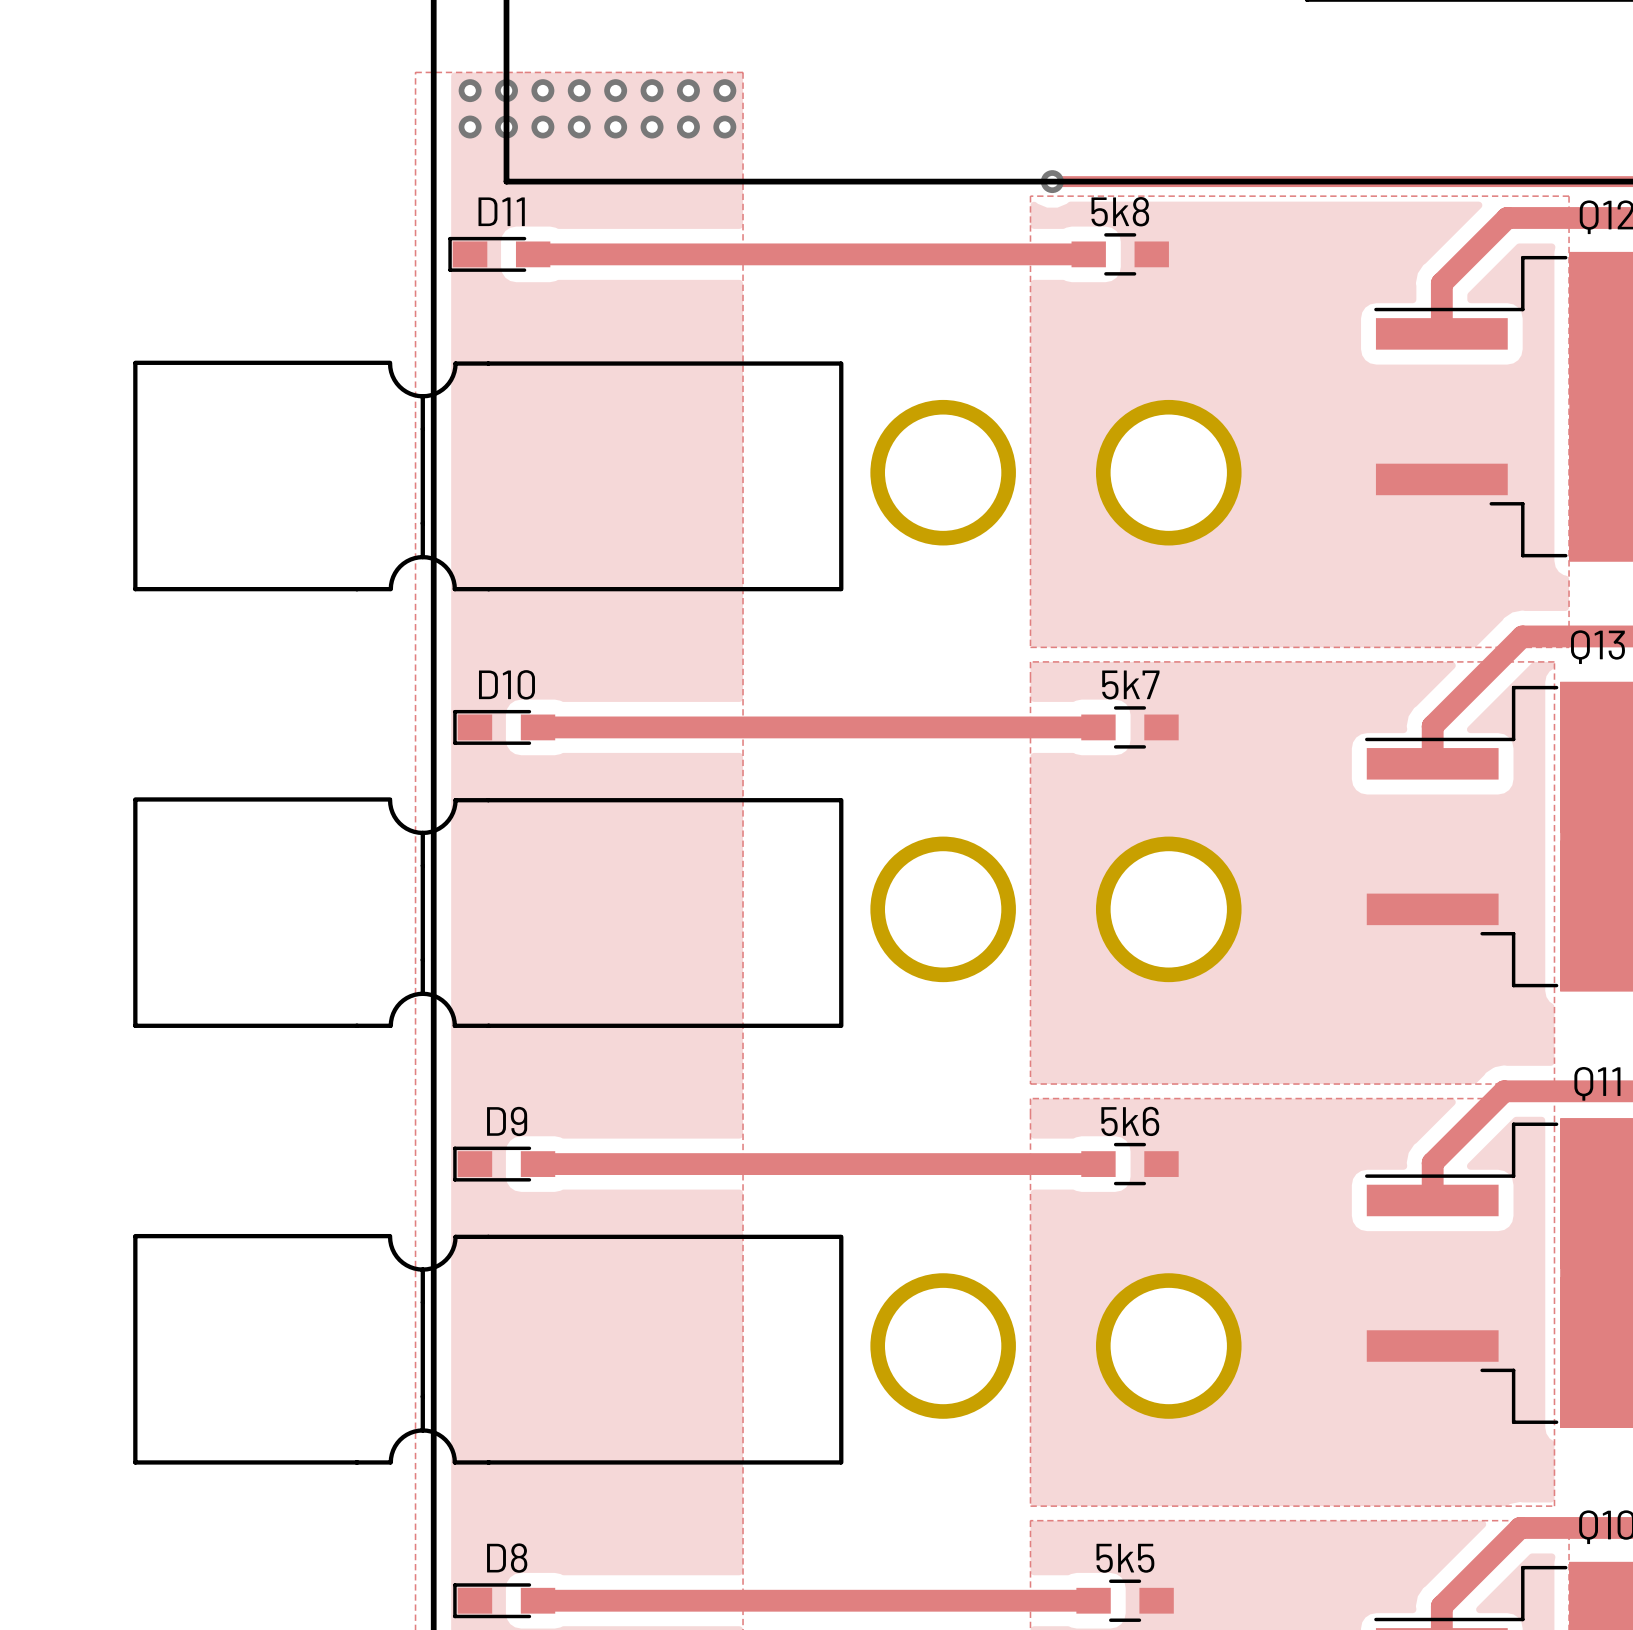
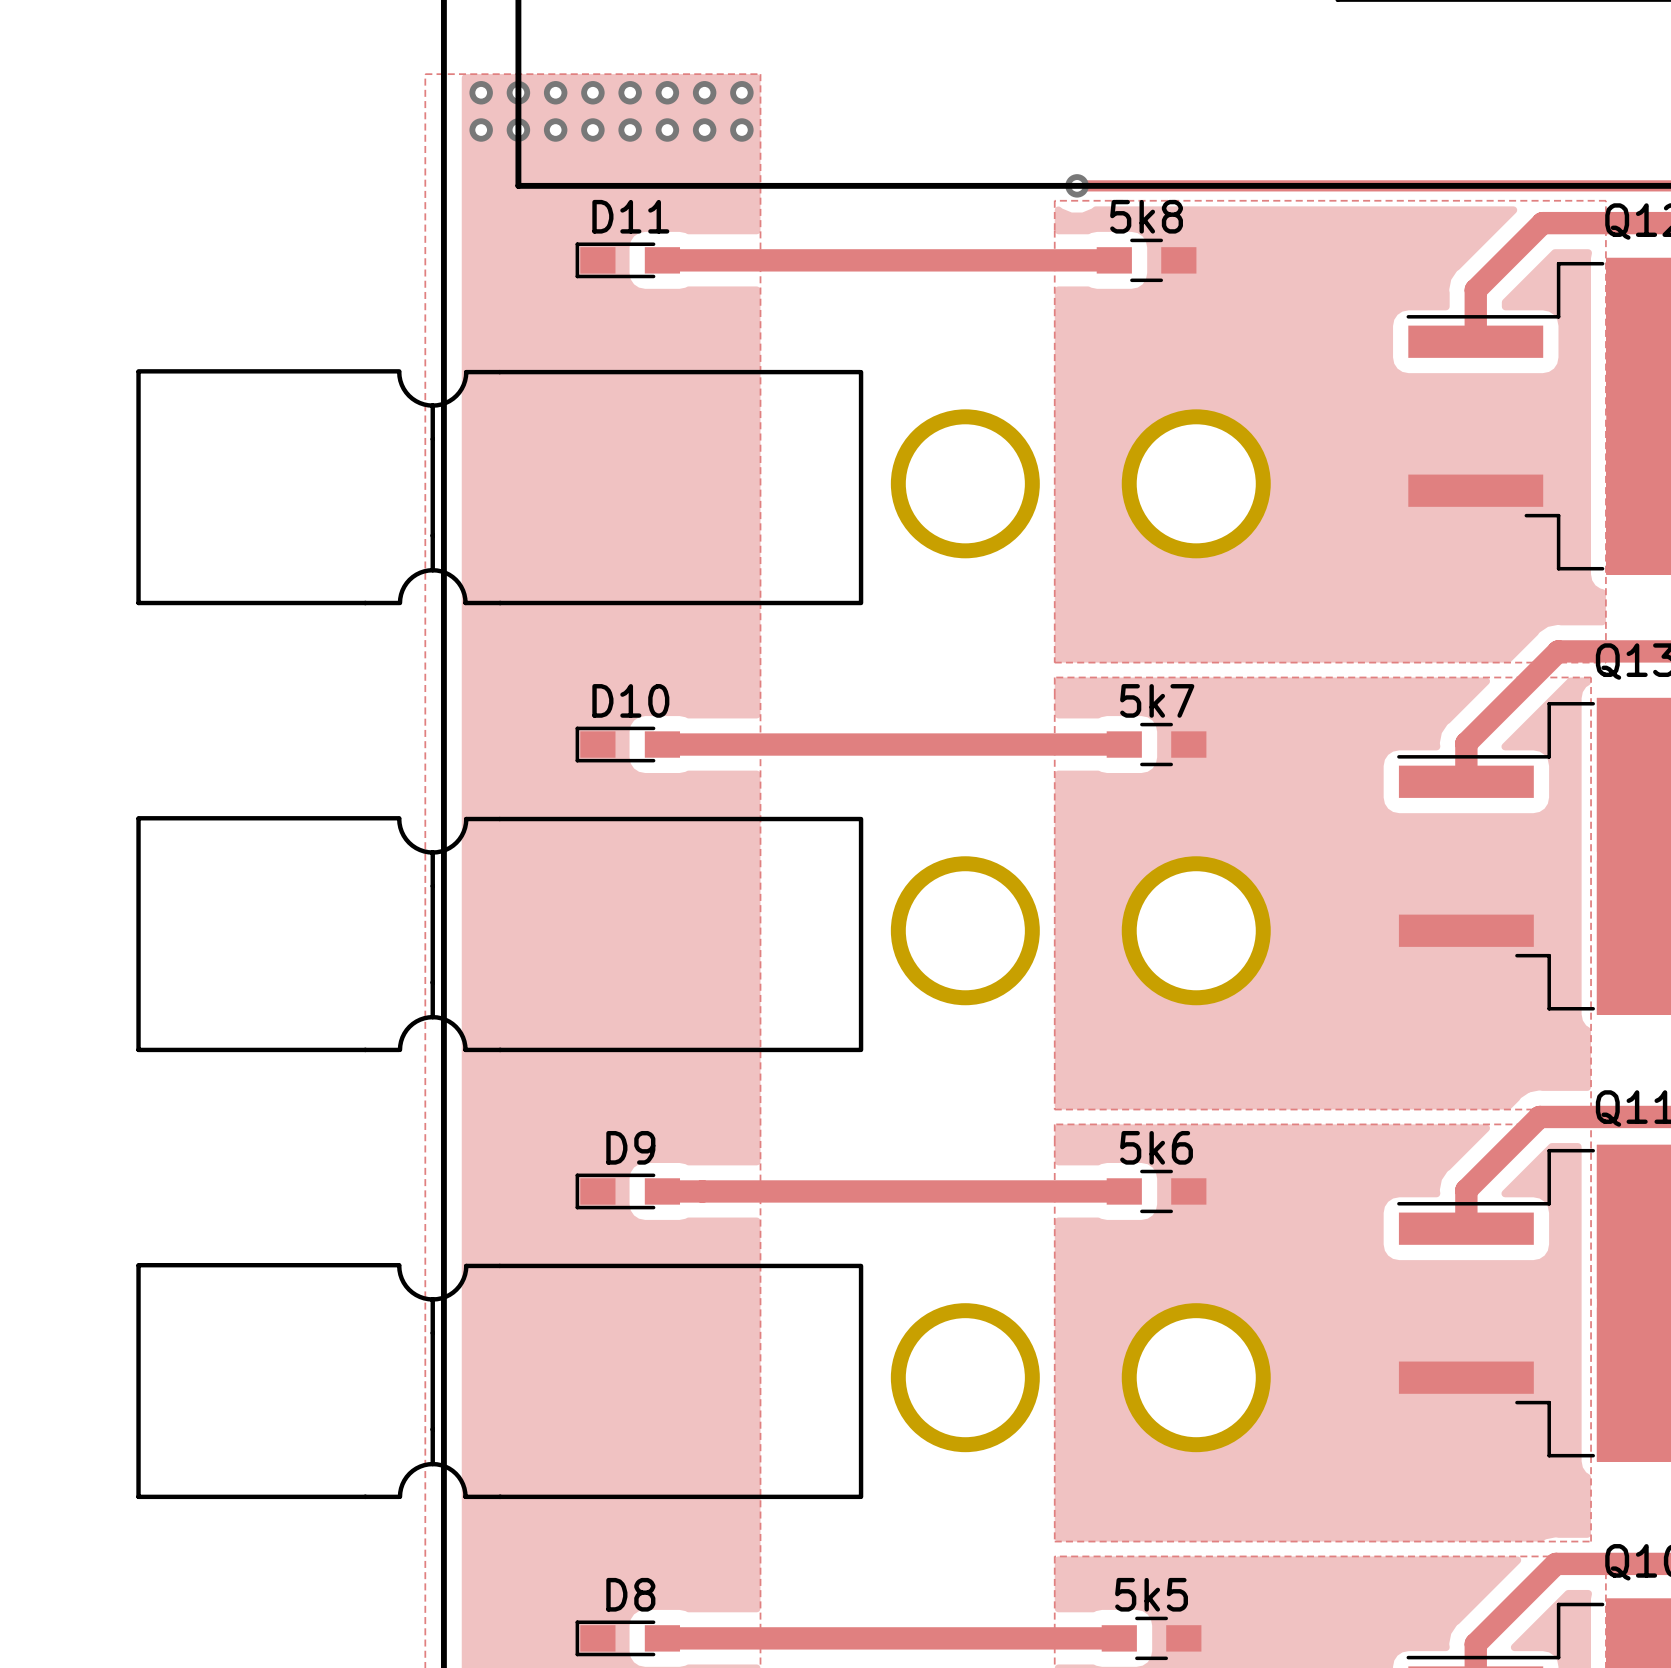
D11 position: (499, 254) -> (627, 260)
track: (533, 254) (647, 254) -> none
D10 position: (504, 727) -> (627, 744)
track: (538, 727) (647, 727) -> none
D9 position: (504, 1164) -> (627, 1191)
track: (538, 1164) (647, 1164) -> none
D8 position: (504, 1600) -> (627, 1638)
track: (538, 1600) (647, 1600) -> none

